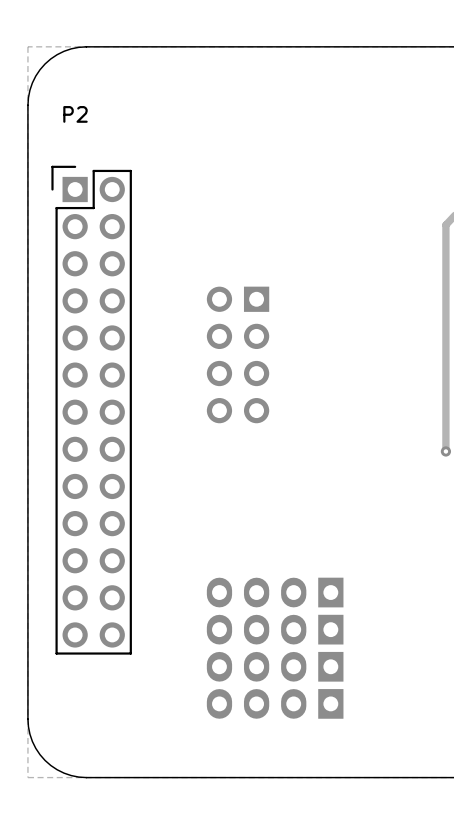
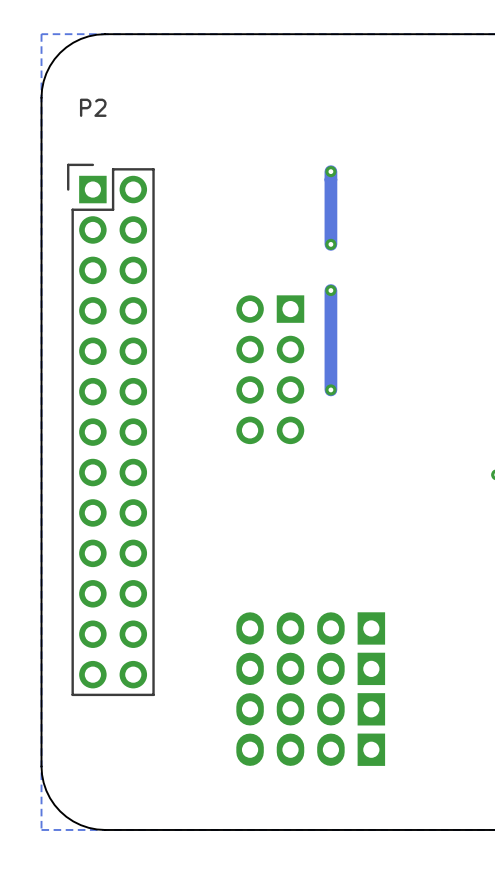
track: none -> (330, 171) (330, 244)
via: none -> (330, 171)
via: none -> (330, 244)
track: none -> (330, 290) (330, 389)
via: none -> (330, 290)
via: none -> (330, 389)

